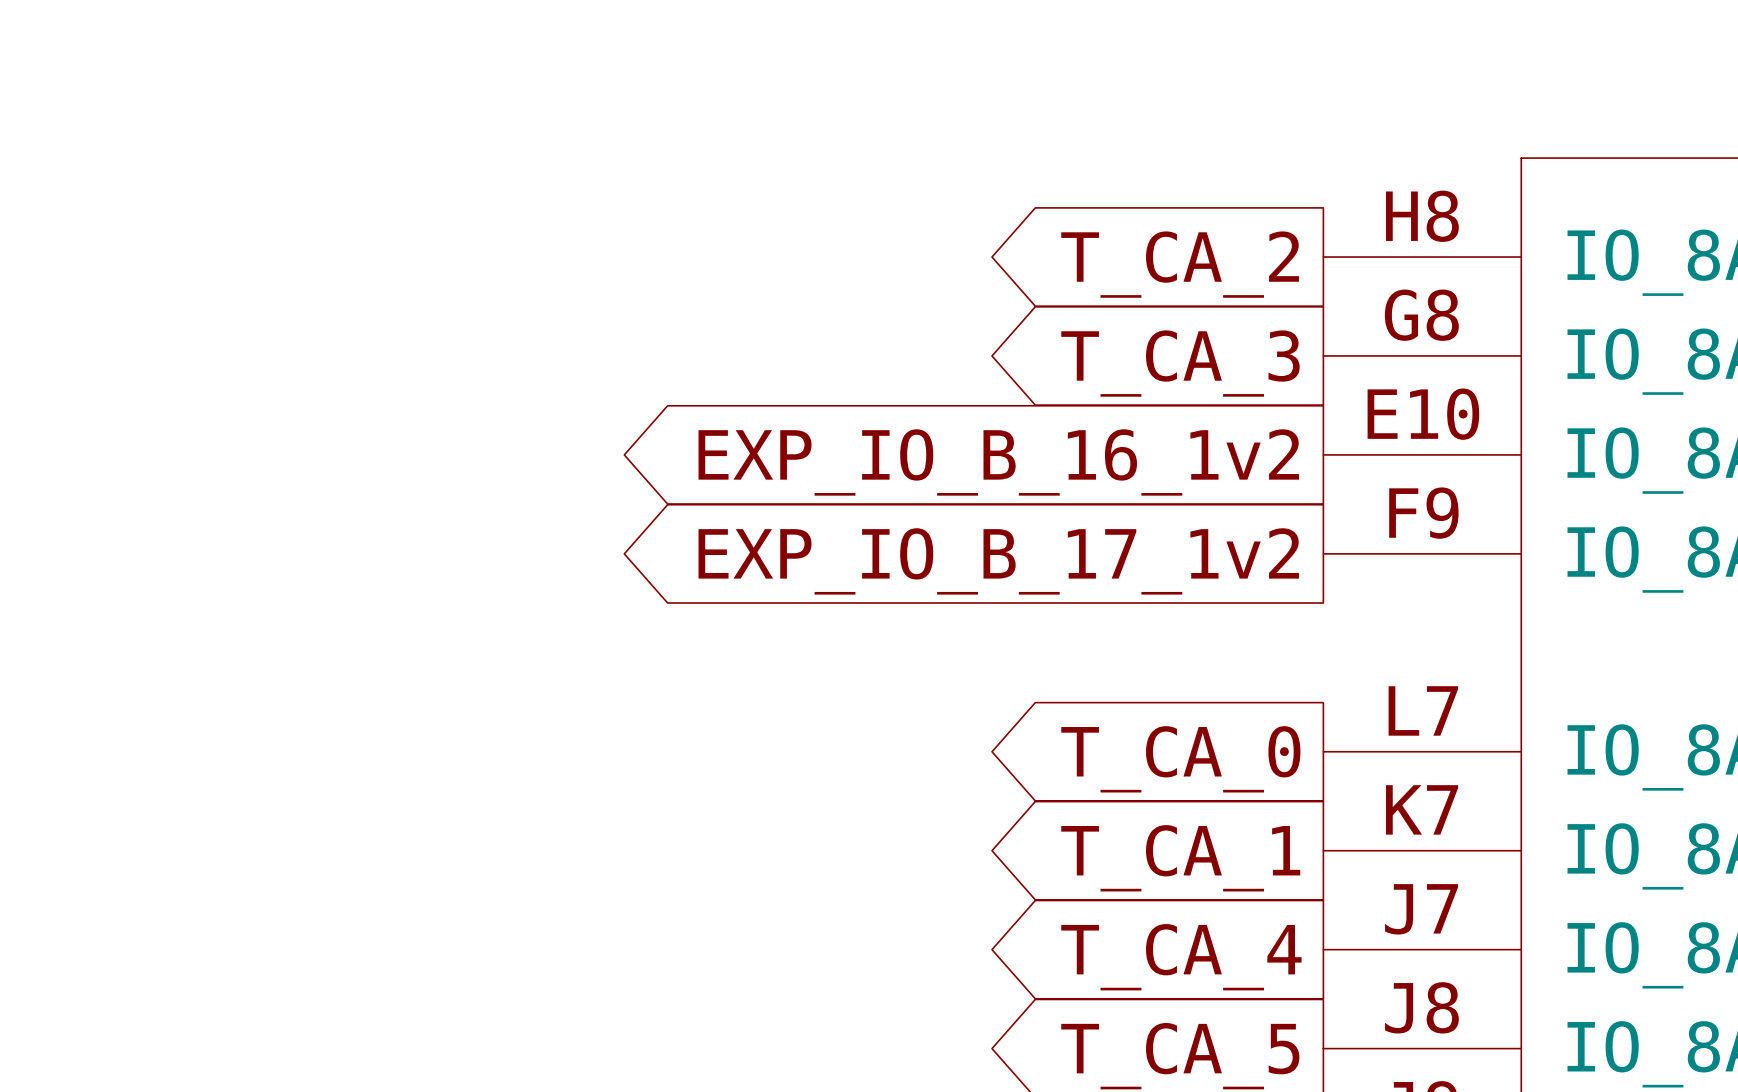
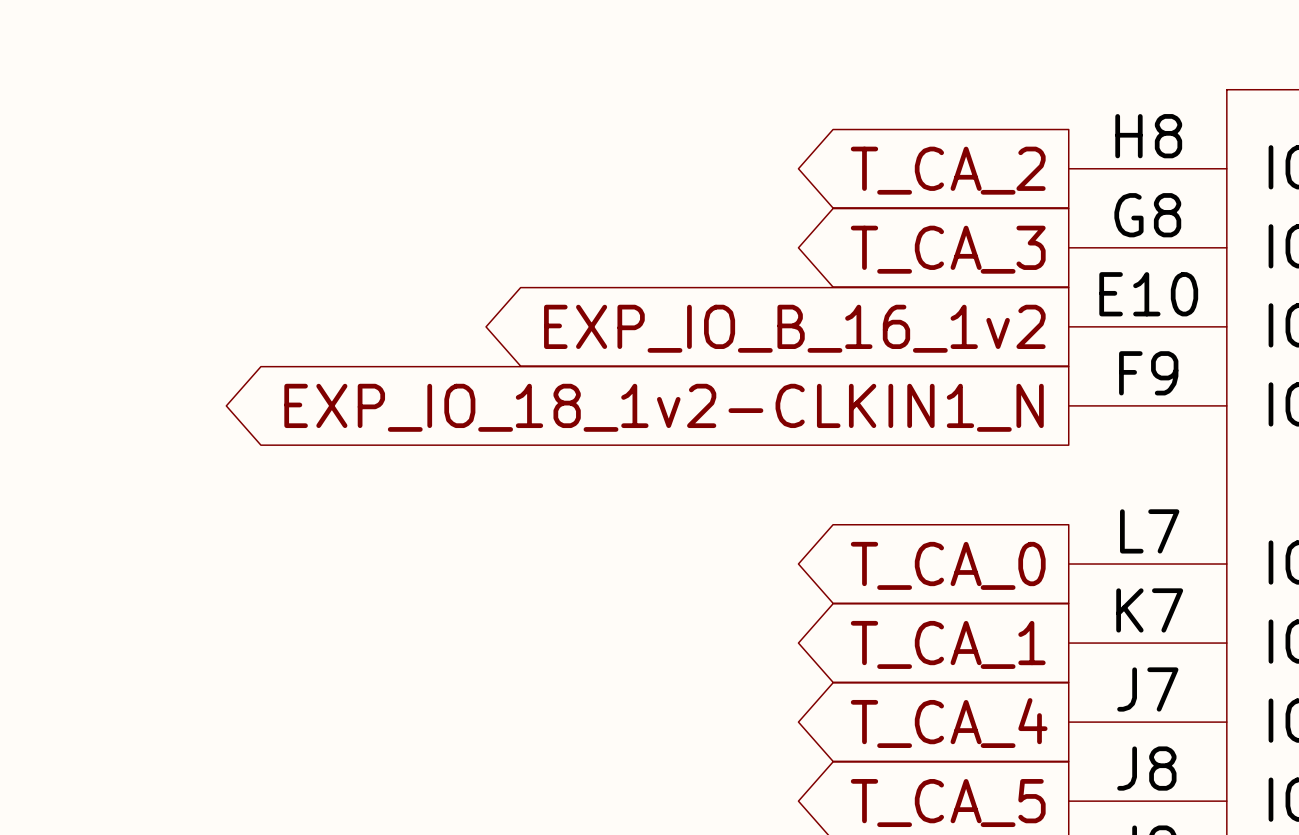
global label: EXP_IO_B_17_1v2 (998, 561) -> EXP_IO_18_1v2-CLKIN1_N (664, 407)

